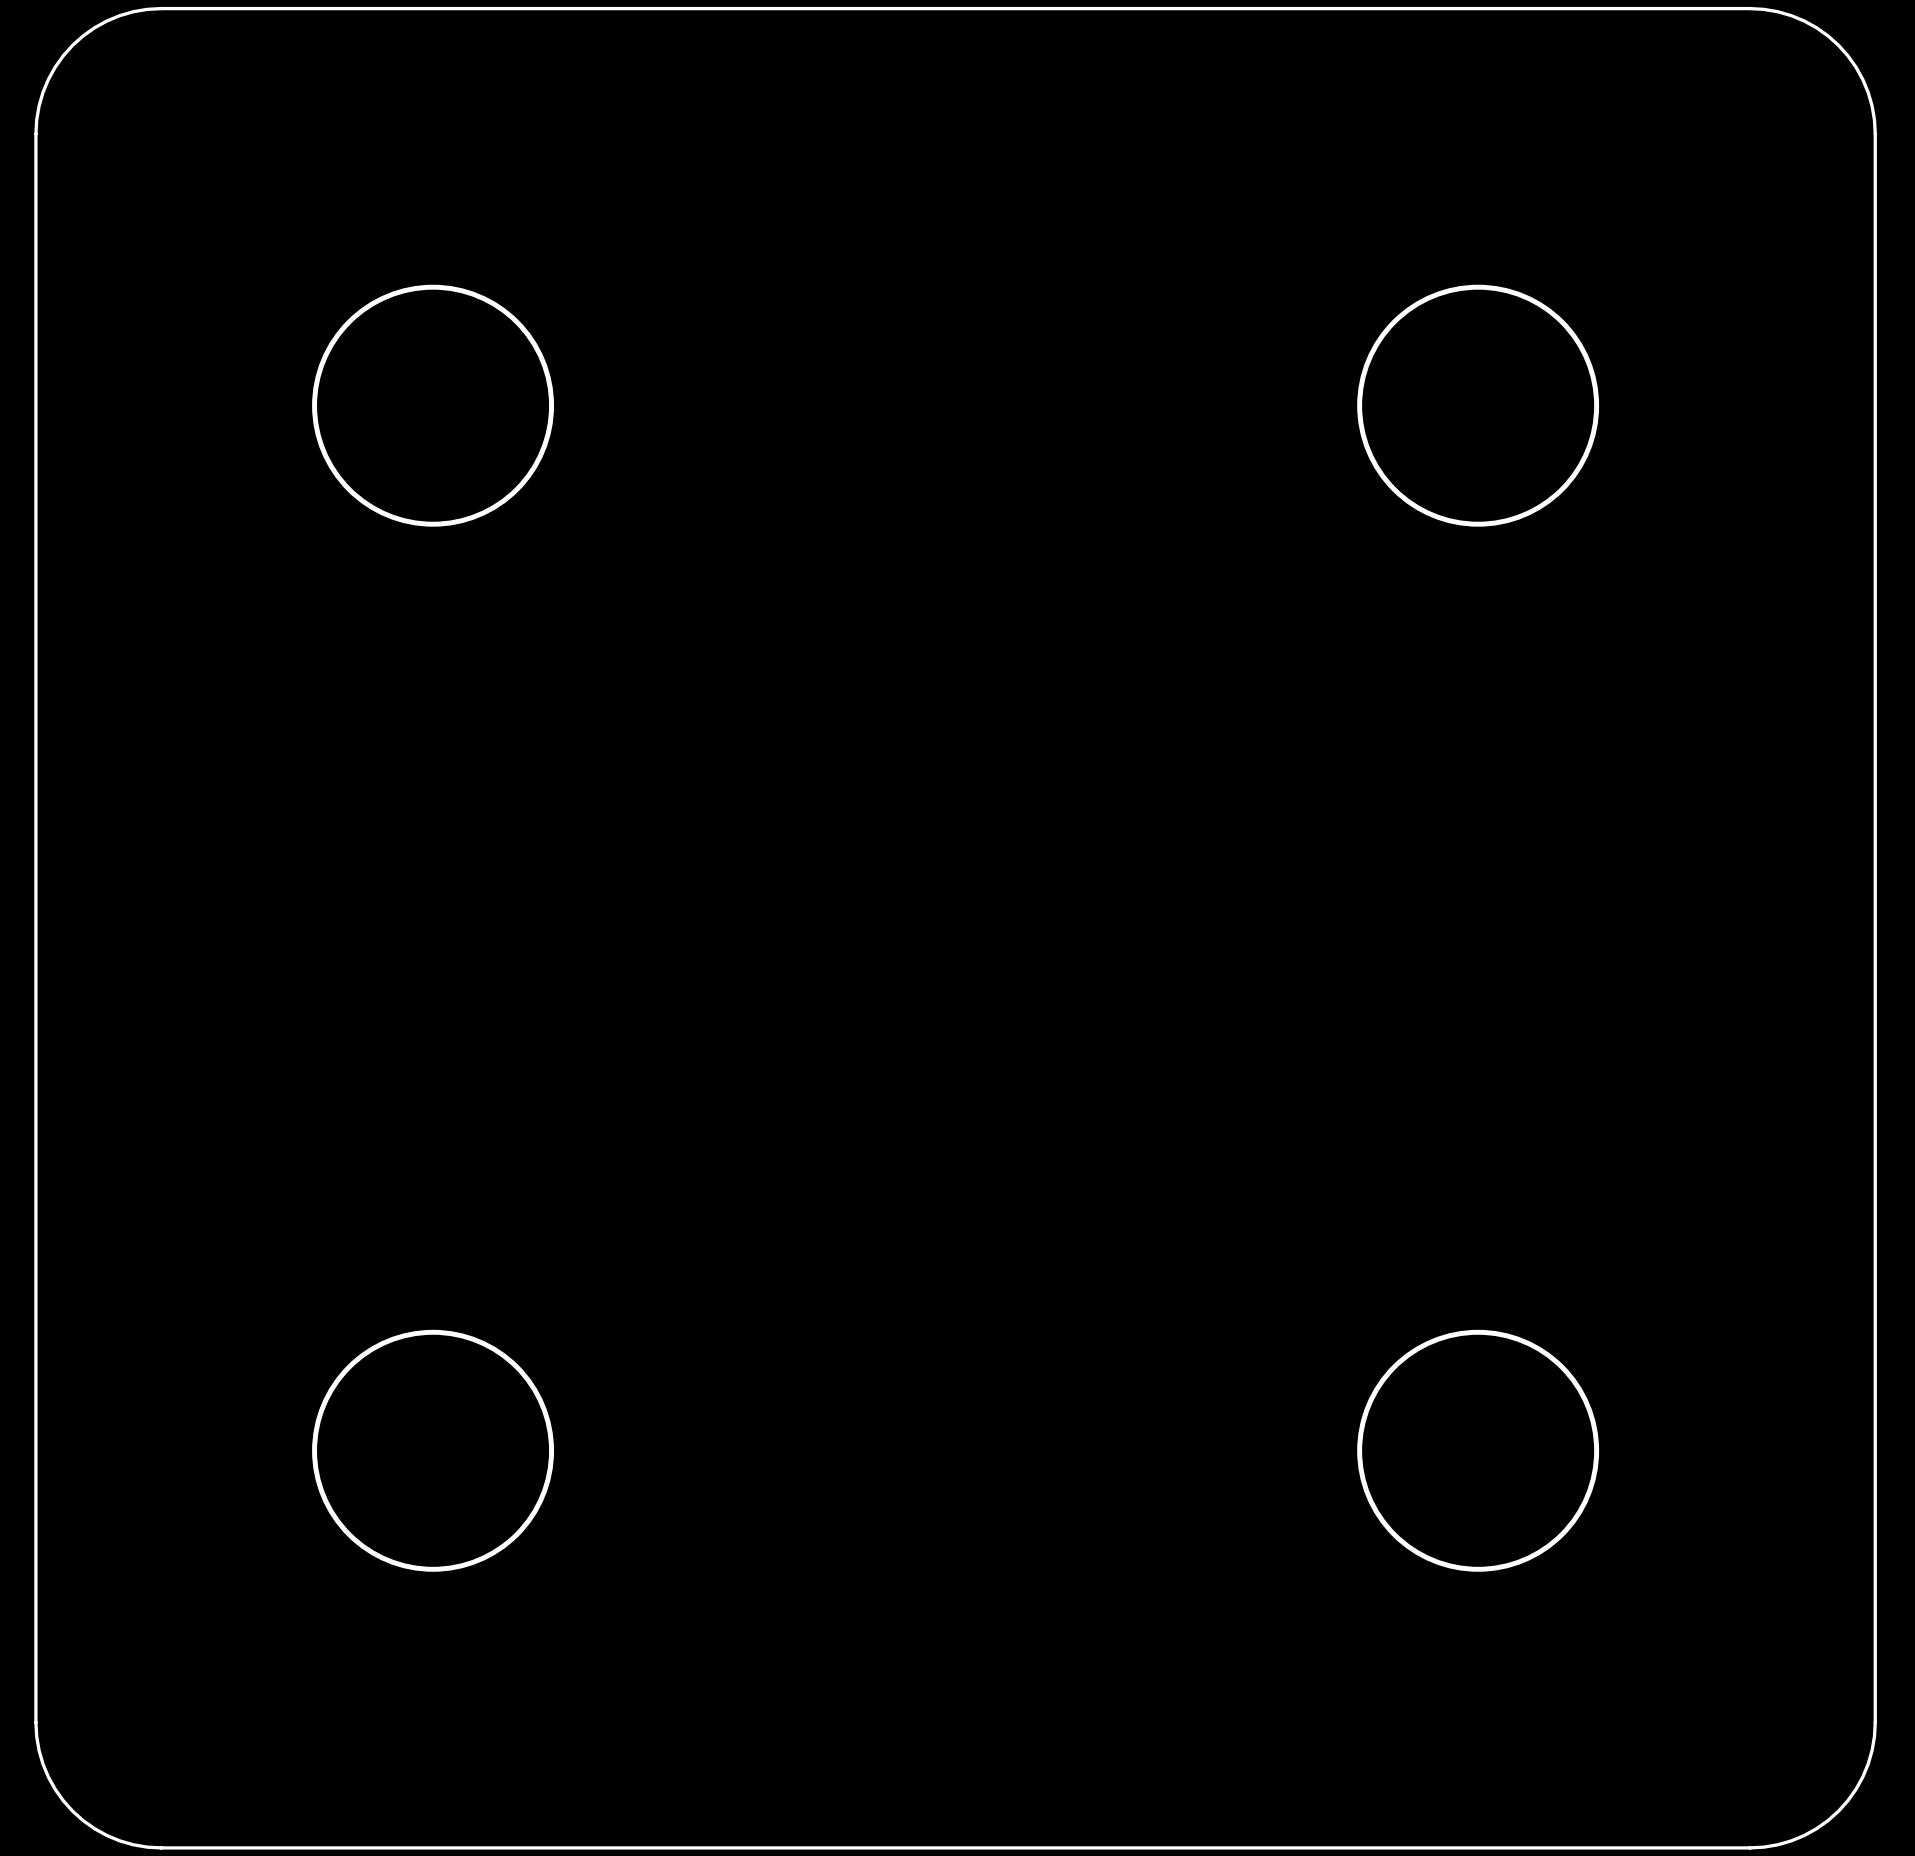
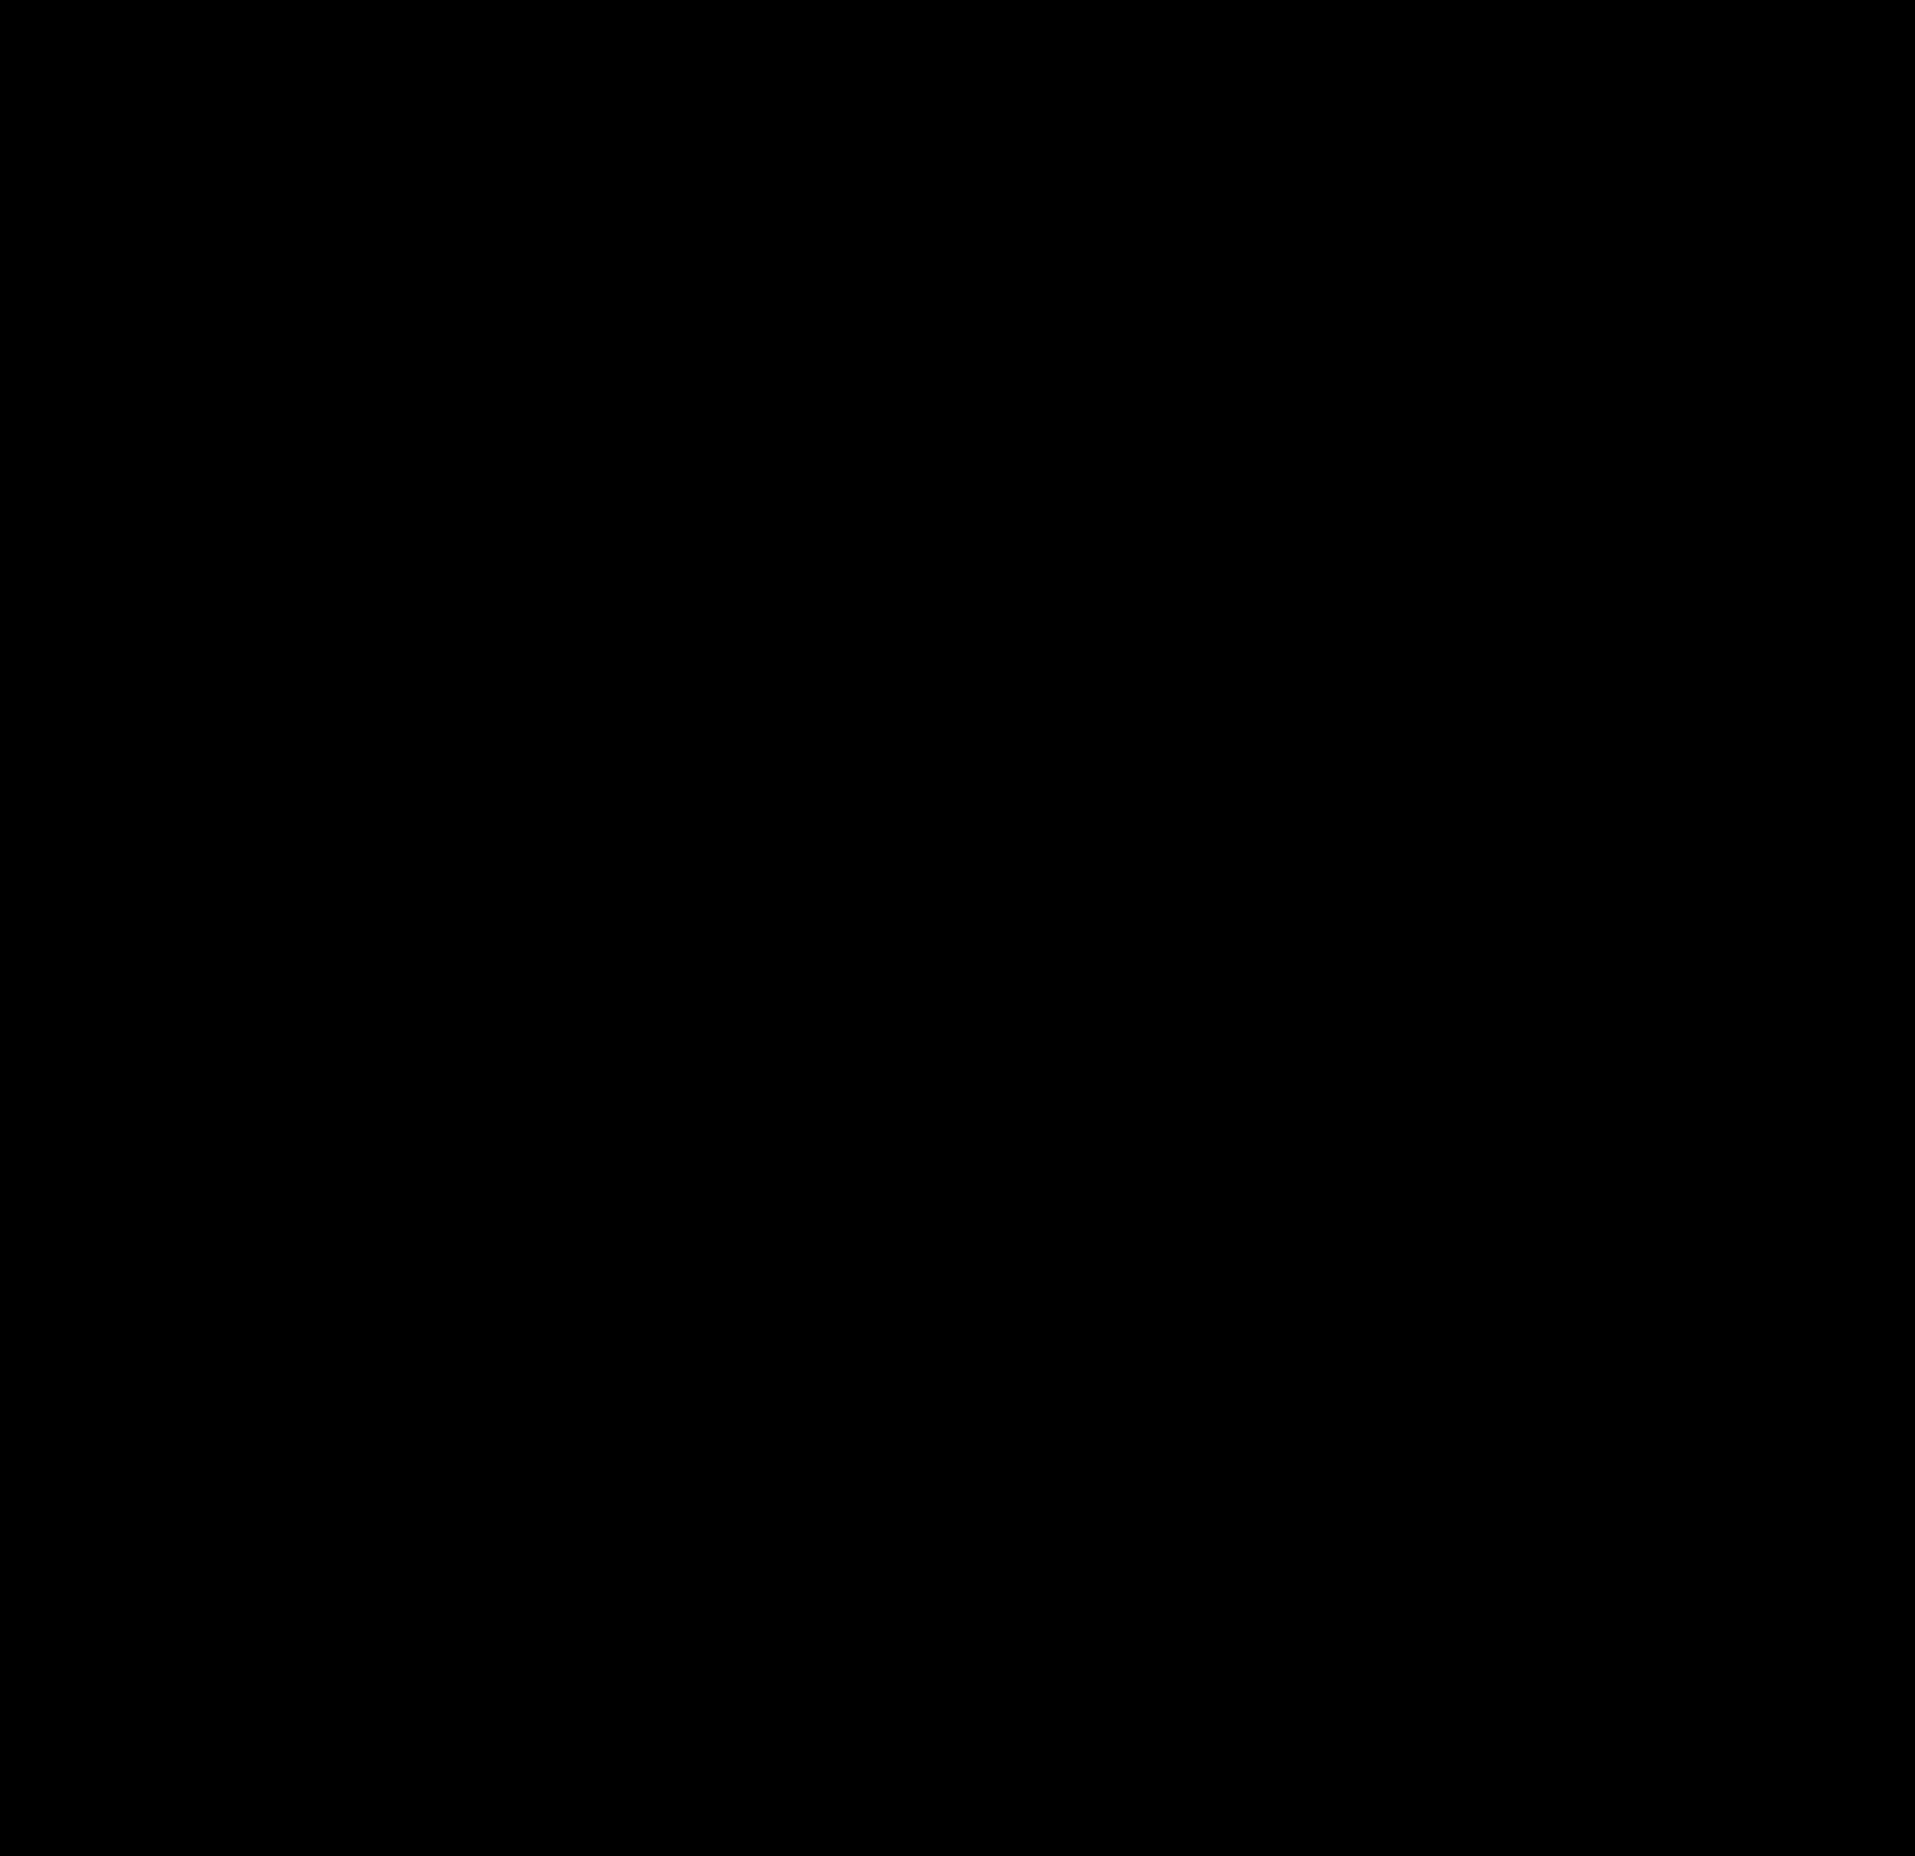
board edge: (161, 8) (1749, 8) (1763, 9) (1791, 15) (1816, 27) (1838, 45) (1856, 67) (1868, 92) (1874, 119) (1875, 133) (1875, 1722) (1872, 1750) (1868, 1763) (1856, 1789) (1838, 1811) (1816, 1828) (1791, 1840) (1763, 1847) (1749, 1847) (161, 1847) (133, 1844) (106, 1835) (83, 1820) (72, 1811) (55, 1789) (48, 1776) (39, 1750) (35, 1722) (35, 133) (36, 119) (42, 92) (55, 67) (72, 45) (94, 27) (119, 15) (147, 9) (161, 8) -> none
round board edge: [312, 284, 555, 527] -> none
round board edge: [1357, 284, 1600, 527] -> none
round board edge: [312, 1329, 555, 1572] -> none
round board edge: [1357, 1329, 1600, 1572] -> none

